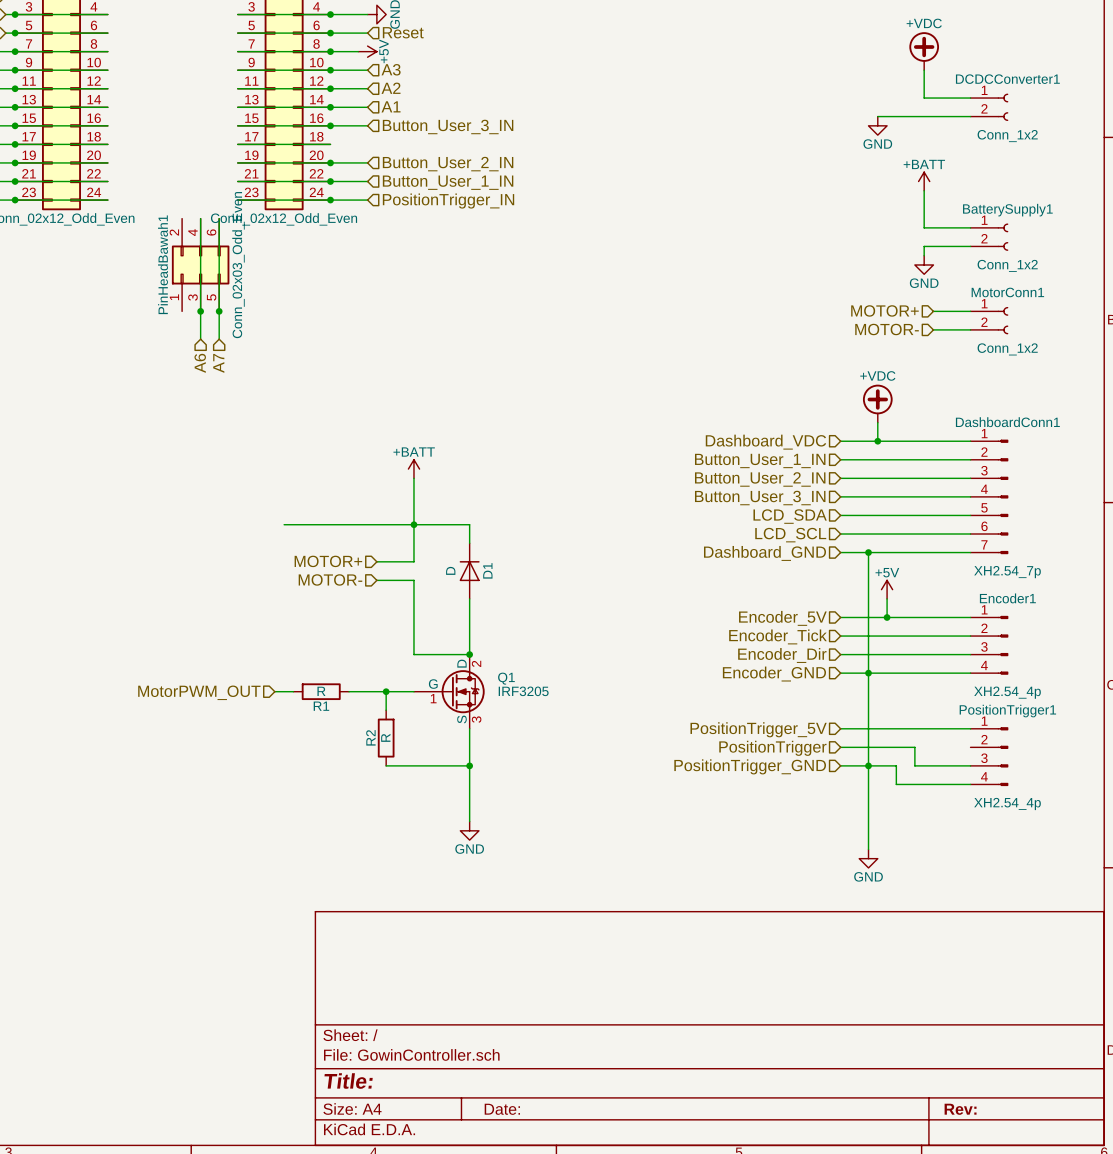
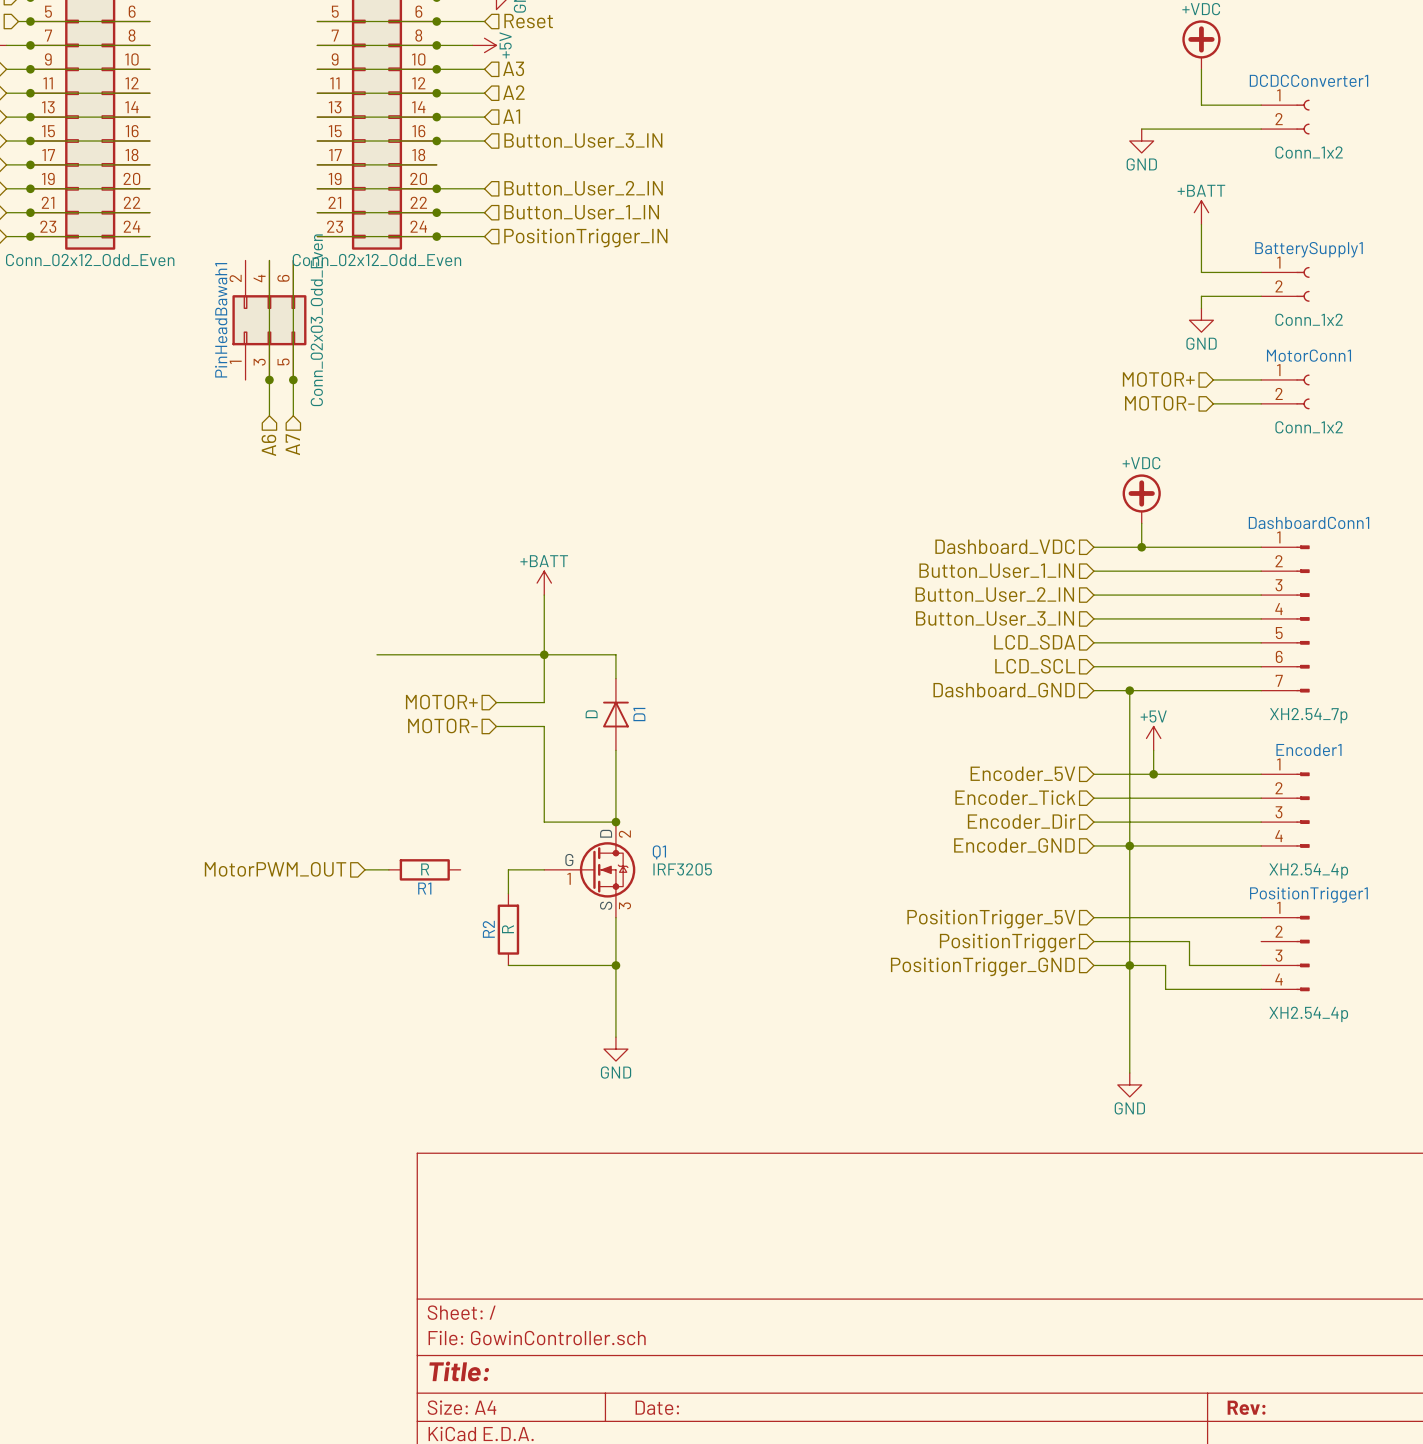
wire: (349, 691) (386, 691) -> none
junction: (386, 691) -> none

